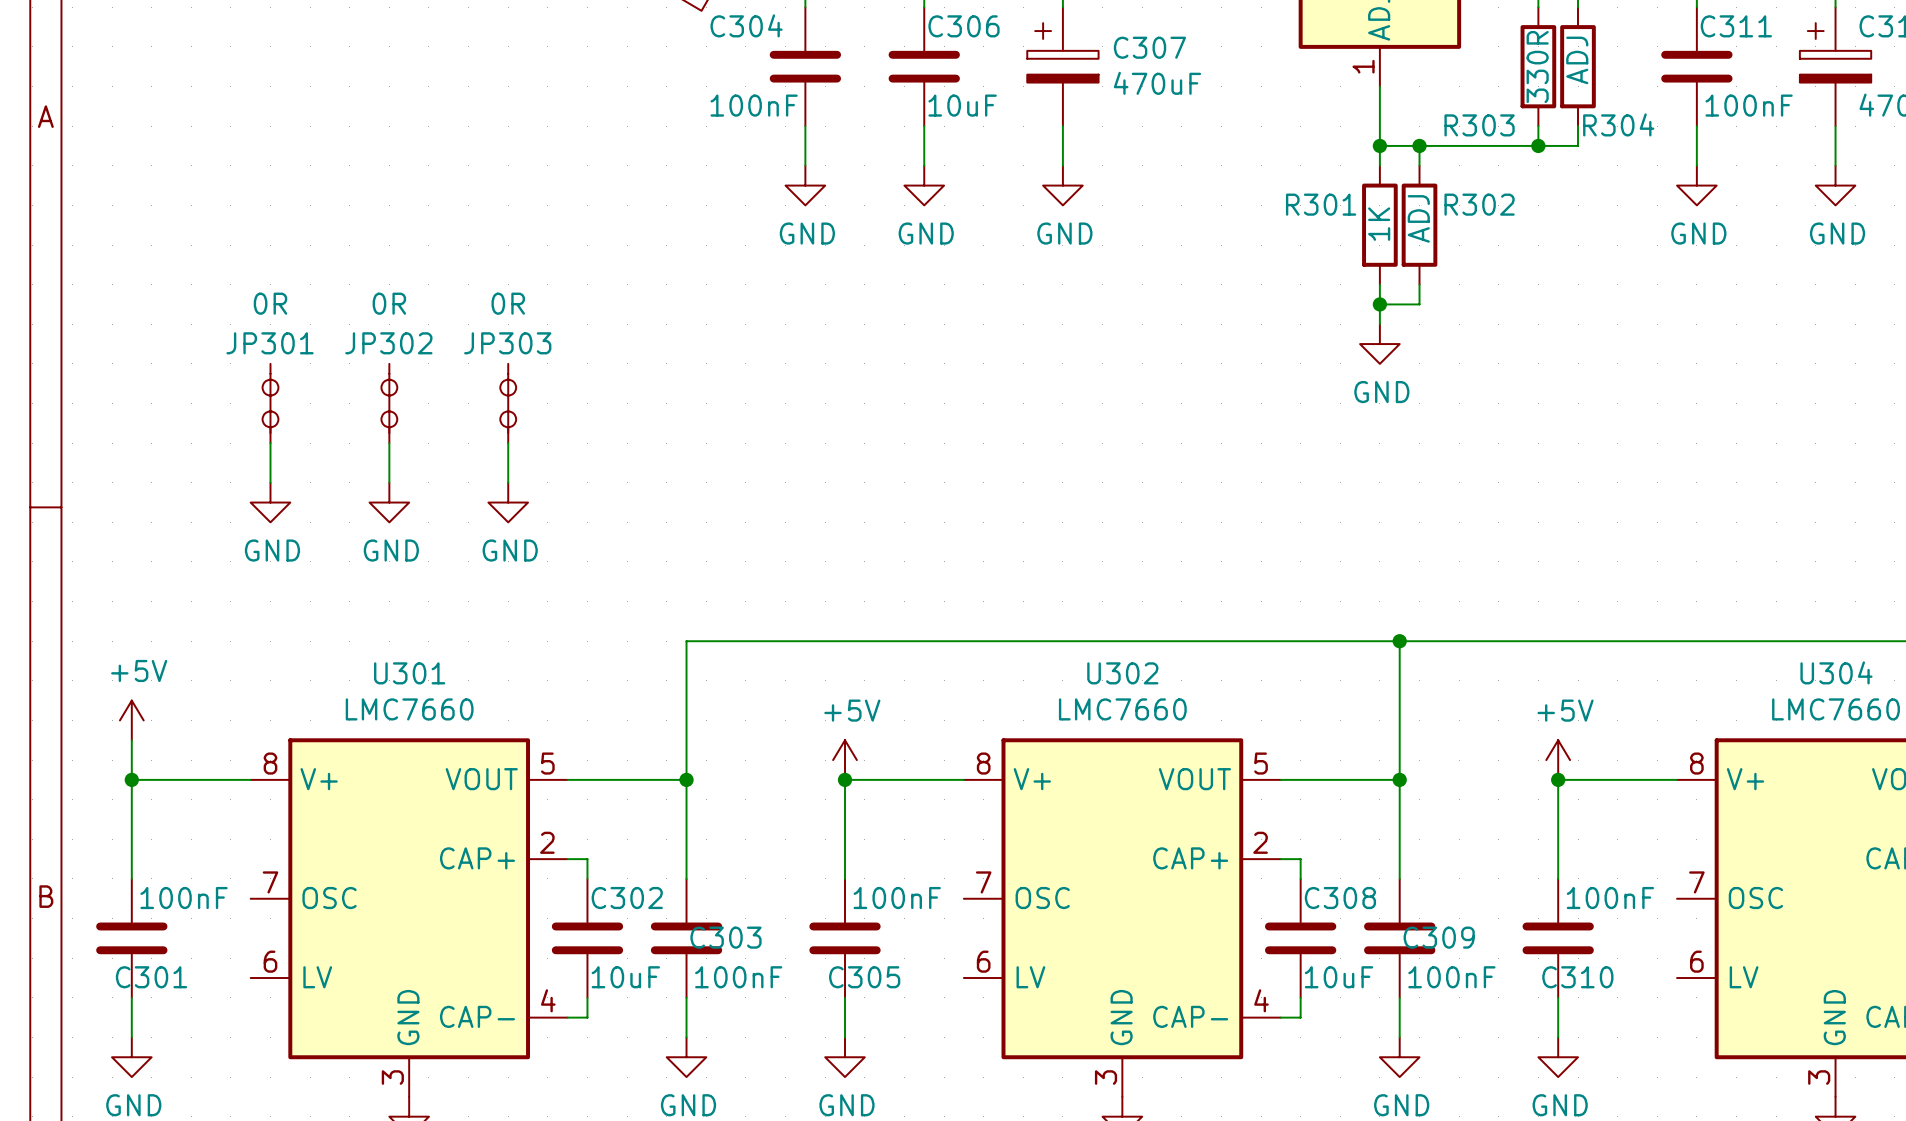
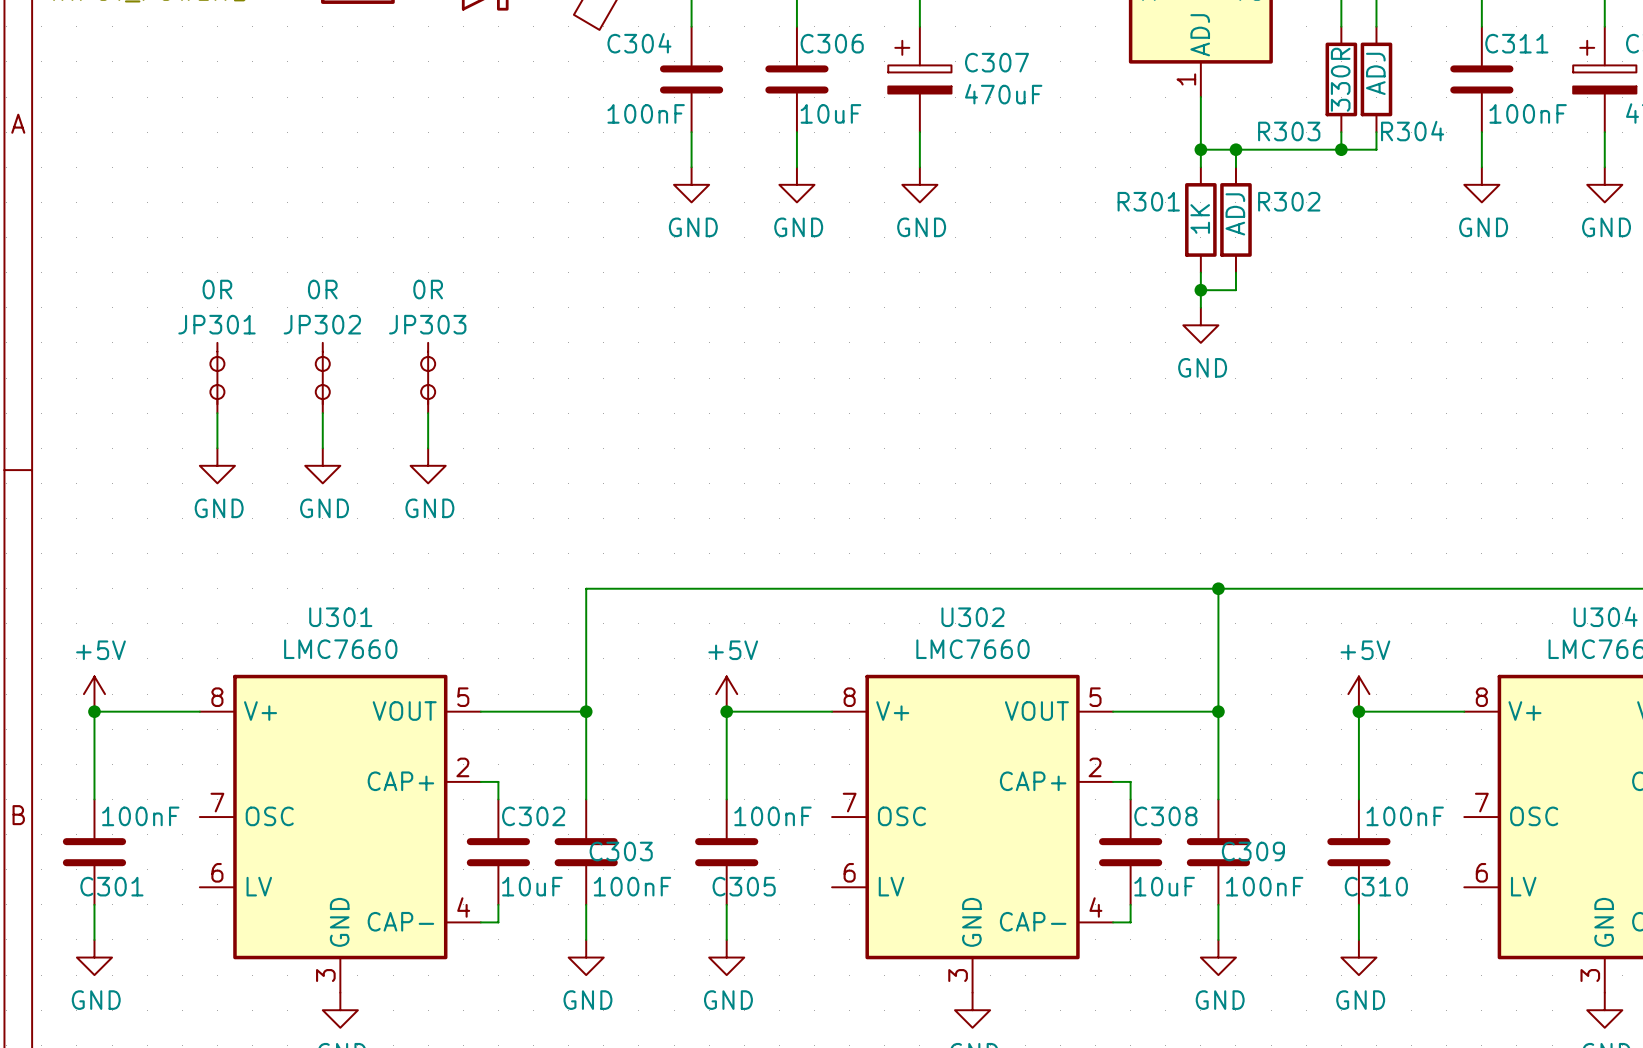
power symbol position: +5V (131, 720) -> +5V (94, 694)

